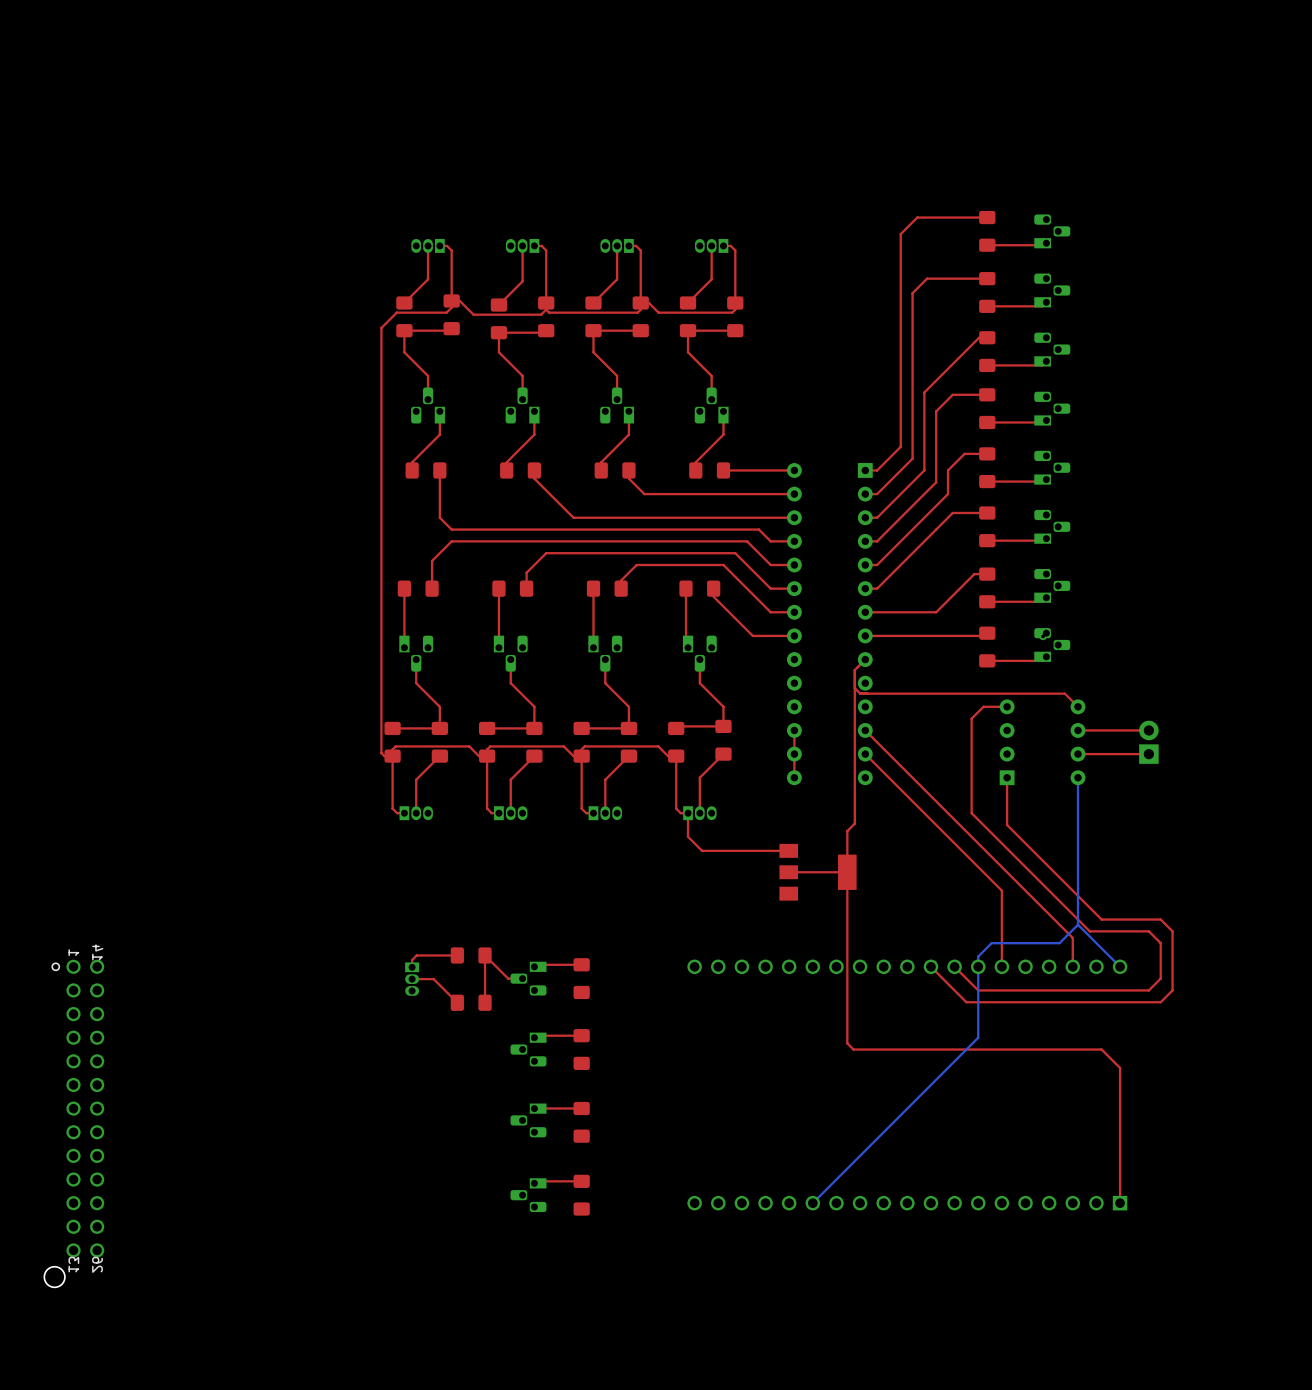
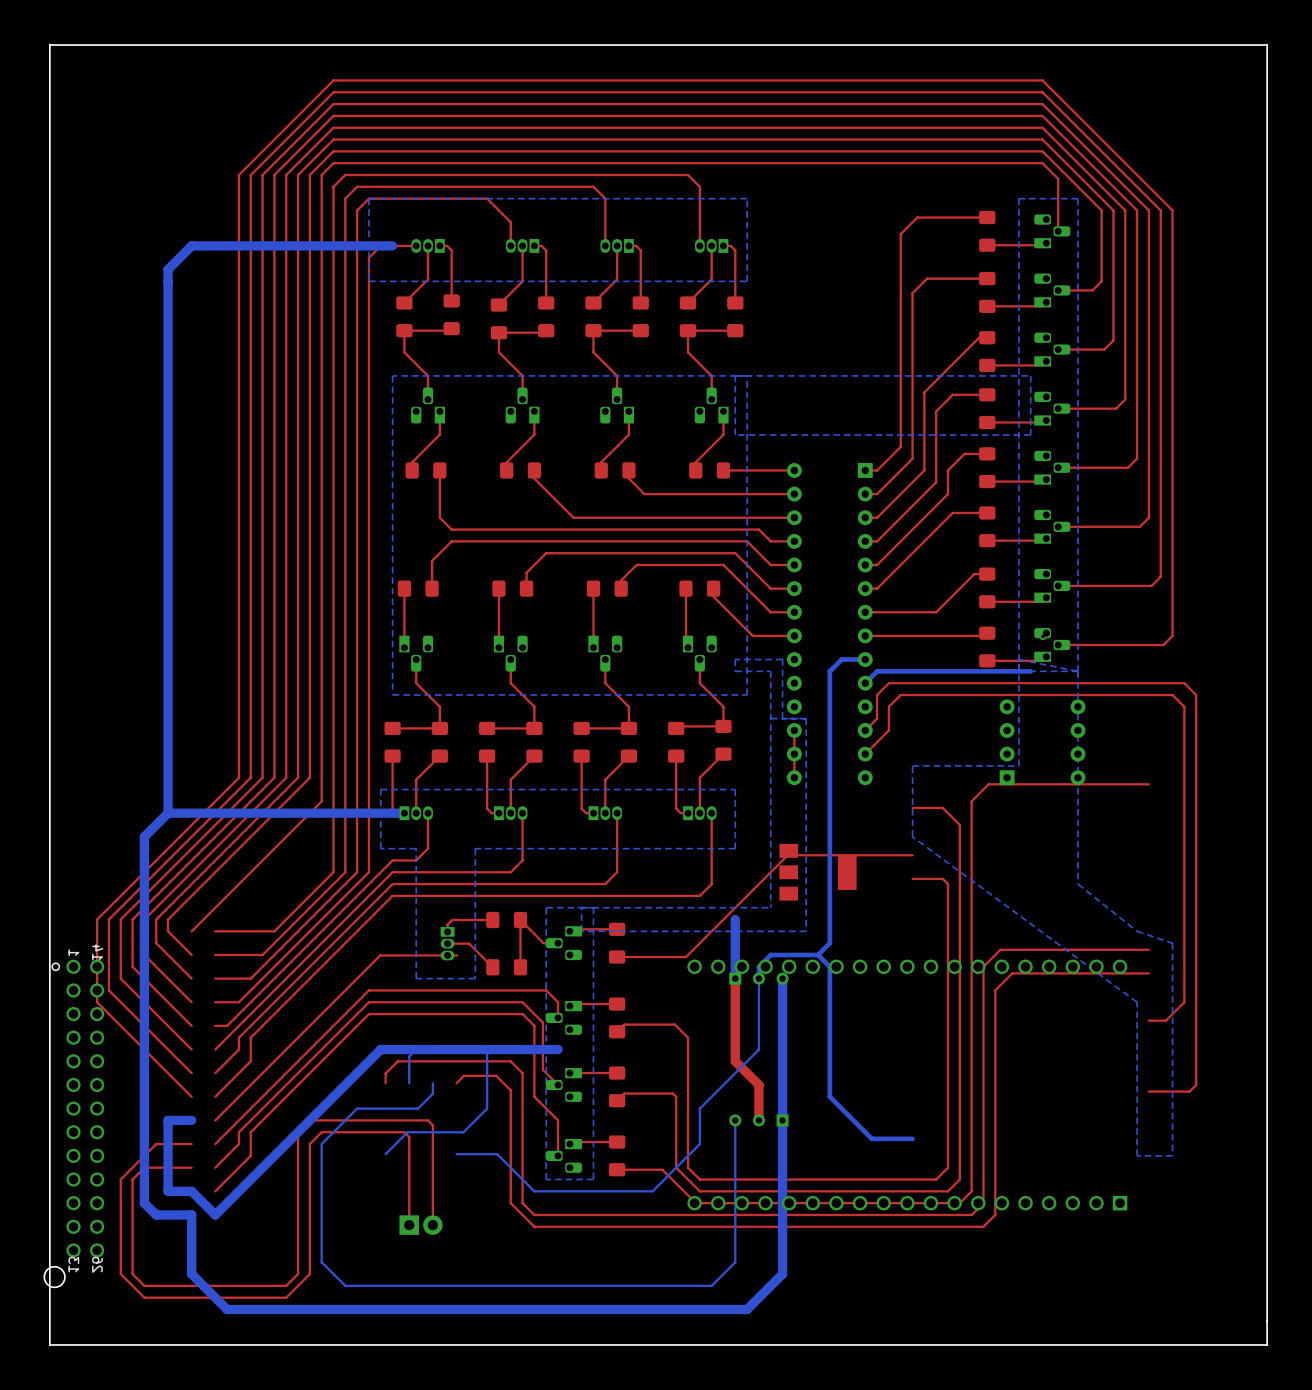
board edge: none -> (1267, 45) (1267, 1344) (49, 1344) (49, 45) (1267, 45)
bottom zone outline: none -> (747, 198) (368, 198) (368, 281) (747, 281) (747, 198)
bottom zone outline: none -> (1078, 198) (1018, 198) (1018, 765) (912, 765) (912, 836) (1137, 1002) (1137, 1155) (1172, 1155) (1172, 943) (1137, 931) (1078, 884) (1078, 198)
top track: none -> (1058, 231) (1058, 178) (1042, 163) (333, 163) (321, 175) (321, 801) (191, 931)
bottom track: none -> (392, 245) (191, 245) (168, 269) (168, 813)
top track: none -> (416, 245) (380, 245) (368, 257) (368, 872) (238, 1002) (215, 1002)
top track: none -> (510, 245) (510, 222) (487, 198) (368, 198) (357, 210) (357, 872) (250, 978) (215, 978)
top track: none -> (605, 245) (605, 198) (593, 186) (357, 186) (345, 198) (345, 872) (262, 954) (215, 954)
top track: none -> (699, 245) (699, 186) (688, 175) (345, 175) (333, 186) (333, 872) (274, 931) (215, 931)
top track: none -> (1058, 290) (1092, 290) (1101, 281) (1101, 210) (1042, 151) (333, 151) (309, 175) (309, 777) (168, 919) (168, 931) (191, 954)
top track: (735, 303) (735, 309) (732, 312) (658, 312) (648, 303) (640, 303) (640, 309) (637, 312) (549, 312) (546, 309) -> none
top track: (546, 309) (541, 314) (473, 314) (459, 300) (451, 300) (451, 307) (446, 312) (396, 312) (381, 328) (381, 753) (384, 756) (392, 756) (392, 749) (395, 746) (469, 746) (478, 756) (487, 756) (487, 749) (490, 746) (563, 746) (573, 756) (581, 756) (581, 749) (584, 746) (658, 746) (668, 756) (676, 756) -> none
top track: none -> (1058, 349) (1104, 349) (1113, 340) (1113, 210) (1042, 139) (333, 139) (298, 175) (298, 777) (156, 919) (156, 943) (191, 978)
bottom zone outline: none -> (747, 375) (747, 695) (392, 695) (392, 375) (1030, 375) (1030, 435) (735, 435) (735, 375)
top track: none -> (1058, 408) (1116, 408) (1125, 399) (1125, 210) (1042, 127) (333, 127) (286, 175) (286, 777) (144, 919) (144, 954) (191, 1002)
top track: none -> (1058, 467) (1128, 467) (1137, 458) (1137, 210) (1042, 115) (333, 115) (274, 175) (274, 777) (132, 919) (132, 966) (191, 1025)
top track: none -> (1058, 526) (1139, 526) (1148, 517) (1148, 210) (1042, 104) (333, 104) (262, 175) (262, 777) (120, 919) (120, 978) (191, 1049)
top track: none -> (1058, 585) (1151, 585) (1160, 576) (1160, 210) (1042, 92) (333, 92) (250, 175) (250, 777) (108, 919) (108, 990) (191, 1073)
top track: none -> (1058, 645) (1163, 645) (1172, 635) (1172, 210) (1042, 80) (333, 80) (238, 175) (238, 777) (97, 919) (97, 1002) (191, 1096)
top track: (865, 659) (854, 670) (854, 823) (847, 831) (847, 1043) (853, 1049) (1101, 1049) (1120, 1067) (1120, 1203) -> none
bottom track: none -> (865, 659) (841, 659) (829, 671) (829, 943) (818, 954)
bottom zone outline: none -> (1018, 659) (1078, 671) (1018, 671)
bottom track: none -> (1030, 671) (877, 671) (865, 683)
top track: (854, 688) (860, 693) (1064, 693) (1078, 706) -> none
top track: (1007, 706) (983, 706) (971, 718) (971, 801) -> (1148, 784) (988, 784) (971, 801)
bottom zone outline: none -> (770, 718) (806, 718) (806, 931) (581, 931) (581, 907)
bottom zone outline: none -> (782, 718) (782, 659) (735, 659) (735, 671) (770, 671) (770, 907) (546, 907) (546, 1179) (593, 1179) (593, 907)
top track: (865, 730) (942, 807) -> (912, 807) (942, 807)
top track: none -> (865, 730) (877, 718) (877, 695) (888, 683) (1184, 683) (1196, 695) (1196, 1084) (1189, 1091) (1148, 1091)
top track: (1148, 730) (1078, 730) -> none
part: (1148, 742) -> none
top track: (865, 754) (1001, 890) (1001, 966) -> (865, 754) (888, 730) (888, 706) (900, 695) (1172, 695) (1184, 706) (1184, 1002) (1165, 1020) (1148, 1020)
top track: (1148, 754) (1078, 754) -> none
top track: (1007, 777) (1007, 825) (1101, 919) (1160, 919) (1172, 931) (1172, 990) (1160, 1002) (966, 1002) (930, 966) -> none
bottom track: (1078, 777) (1078, 924) -> none
bottom zone outline: none -> (735, 789) (735, 848) (475, 848) (475, 978) (416, 978) (416, 848) (380, 848) (380, 789) (735, 789)
bottom track: none -> (168, 813) (144, 836) (144, 1203) (156, 1214) (191, 1214) (191, 1274) (227, 1309) (747, 1309) (782, 1274) (782, 978)
bottom track: none -> (404, 813) (168, 813)
top track: none -> (428, 813) (428, 848) (416, 860) (392, 860) (227, 1025) (215, 1025)
top track: none -> (522, 813) (522, 860) (510, 872) (392, 872) (215, 1049)
top track: none -> (617, 813) (617, 872) (605, 884) (392, 884) (238, 1037) (238, 1049) (215, 1073)
top track: (688, 813) (688, 836) (702, 850) (788, 850) -> none
top track: none -> (711, 813) (711, 884) (699, 895) (392, 895) (250, 1037) (250, 1061) (215, 1096)
top track: (971, 813) (1089, 931) (1148, 931) (1160, 943) (1160, 978) (1148, 990) (978, 990) (954, 966) -> (971, 813) (971, 1191) (959, 1203) (695, 1203) (662, 1169) (617, 1169)
top track: (959, 825) (1072, 937) (1072, 966) -> (959, 825) (959, 1179) (948, 1191) (699, 1191) (676, 1167) (676, 1096) (672, 1093) (624, 1093) (617, 1100)
top track: none -> (912, 855) (787, 855) (686, 957) (617, 957)
top track: (847, 872) (788, 872) -> none
top track: none -> (912, 878) (942, 878) (948, 884) (948, 1167) (936, 1179) (699, 1179) (688, 1167) (688, 1037) (674, 1024) (624, 1024) (617, 1031)
bottom track: none -> (735, 919) (735, 978)
top track: none -> (492, 920) (452, 920) (447, 924) (447, 931)
part: none -> (506, 920)
bottom track: (1078, 924) (1120, 966) -> none
bottom track: (1078, 924) (1059, 943) (991, 943) (978, 956) (978, 1037) (812, 1203) -> none
part: none -> (563, 943)
part: none -> (617, 943)
top track: none -> (1148, 949) (1000, 949) (983, 966) (983, 1203) (971, 1214) (534, 1214) (522, 1203) (522, 1073) (510, 1061) (397, 1061) (385, 1073) (385, 1083)
bottom track: none -> (818, 954) (770, 954) (758, 966) (758, 1049) (699, 1108) (699, 1144) (652, 1191) (534, 1191) (497, 1154) (456, 1154)
bottom track: none -> (818, 954) (829, 966) (829, 1096) (871, 1138) (912, 1138)
top track: (416, 955) (412, 960) (412, 967) -> (416, 955) (380, 955) (215, 1120)
part: (471, 955) -> none
top track: (581, 964) (536, 964) (534, 966) -> (617, 929) (571, 929) (569, 931)
part: none -> (506, 967)
top track: none -> (1148, 973) (1012, 973) (995, 990) (995, 1214) (983, 1226) (534, 1226) (510, 1203) (510, 1090) (496, 1075) (463, 1075) (456, 1083)
top track: (522, 978) (508, 978) (485, 955) (485, 1002) -> (558, 943) (543, 943) (520, 920) (520, 967)
part: (528, 978) -> none
part: (581, 978) -> none
top track: none -> (735, 978) (735, 1061) (758, 1084) (758, 1120)
part: none -> (758, 978)
top track: (412, 979) (433, 979) (457, 1002) -> (447, 943) (469, 943) (492, 967)
part position: (412, 979) -> (447, 943)
part: (471, 1002) -> none
top track: none -> (554, 1014) (558, 1017) (558, 1002) (546, 990) (368, 990) (215, 1144)
part: none -> (563, 1017)
part: none -> (617, 1017)
top track: (581, 1035) (536, 1035) (534, 1037) -> (617, 1004) (571, 1004) (569, 1006)
bottom track: none -> (428, 1049) (416, 1049) (409, 1056) (409, 1083)
bottom track: none -> (487, 1049) (487, 1108) (463, 1132) (407, 1132) (385, 1154)
part: (528, 1049) -> none
bottom track: none -> (558, 1049) (380, 1049) (215, 1214) (191, 1191) (168, 1191) (168, 1120) (191, 1120)
part: (581, 1049) -> none
bottom track: none -> (432, 1083) (432, 1093) (418, 1108) (357, 1108) (321, 1144) (321, 1262) (345, 1285) (711, 1285) (735, 1262) (735, 1120)
top track: none -> (558, 1084) (542, 1069) (542, 1022) (522, 1002) (368, 1002) (238, 1132) (238, 1144) (215, 1167)
part: none -> (563, 1084)
part: none -> (617, 1086)
top track: (581, 1108) (534, 1108) -> (617, 1073) (569, 1073)
part: (528, 1120) -> none
part: none -> (758, 1120)
part: (581, 1122) -> none
top track: none -> (191, 1144) (156, 1144) (120, 1179) (120, 1274) (144, 1297) (286, 1297) (309, 1274) (309, 1144) (321, 1132) (404, 1132) (409, 1137) (409, 1225)
top track: none -> (558, 1155) (558, 1120) (534, 1096) (534, 1025) (522, 1014) (368, 1014) (250, 1132) (250, 1155) (215, 1191)
part: none -> (563, 1155)
part: none -> (617, 1155)
top track: none -> (191, 1167) (144, 1167) (132, 1179) (132, 1274) (144, 1285) (286, 1285) (298, 1274) (298, 1132) (309, 1120) (428, 1120) (432, 1125) (432, 1225)
top track: (581, 1181) (536, 1181) (534, 1183) -> (617, 1142) (571, 1142) (569, 1144)
part: (528, 1195) -> none
part: (581, 1195) -> none
part: none -> (421, 1225)

